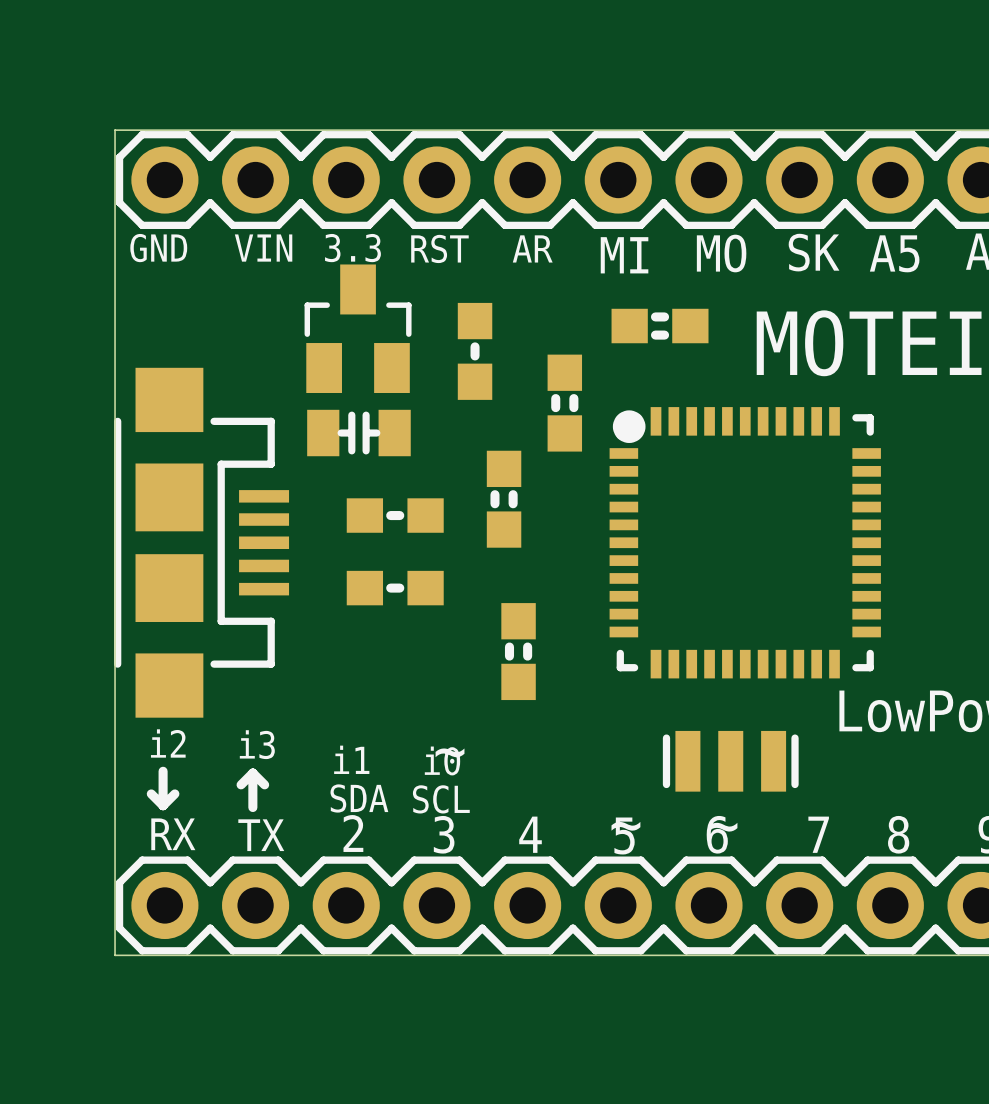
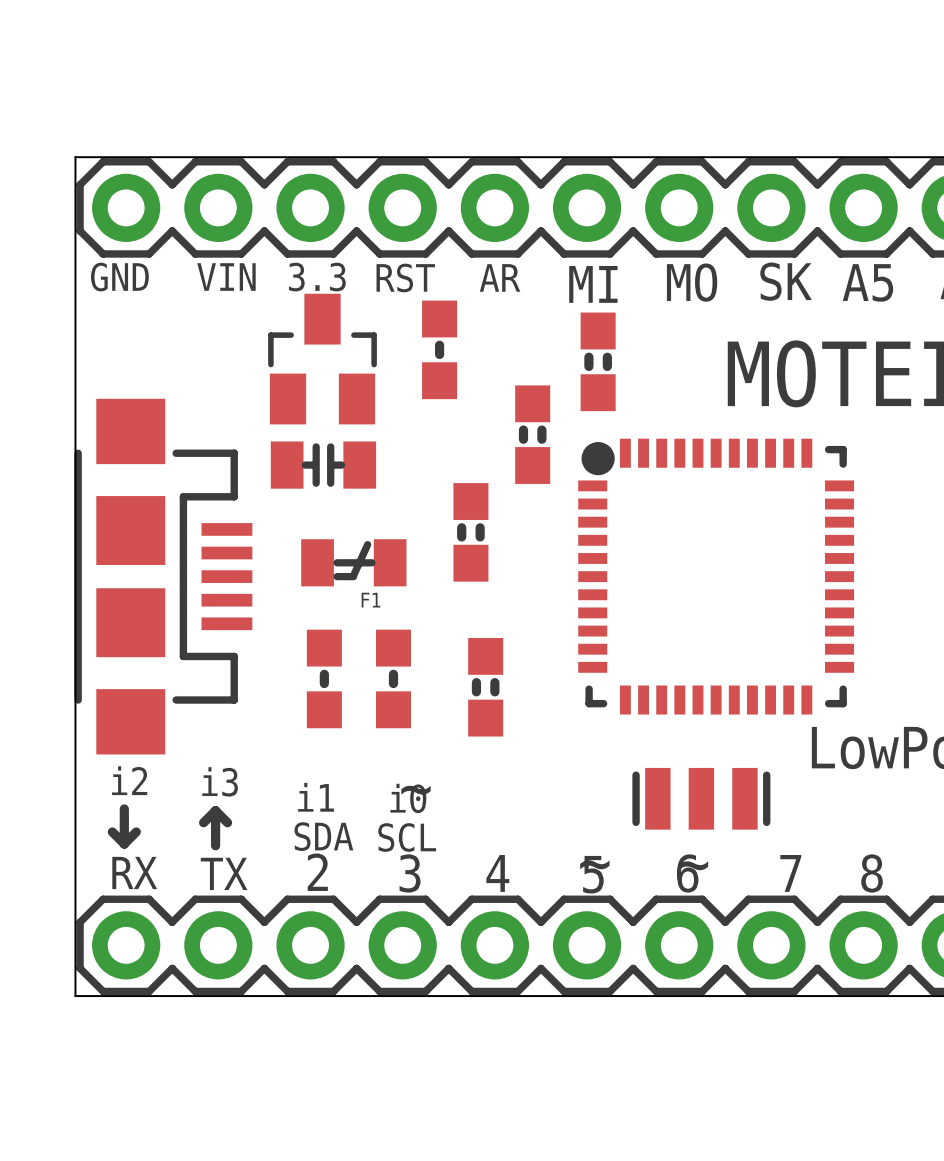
part rotation: 0° (660, 326) -> 90° clockwise (598, 361)
part position: (475, 351) -> (439, 349)
part: (395, 515) -> none
F1: none -> (353, 562)
part: (395, 588) -> none
part: none -> (324, 678)
part: none -> (393, 678)

